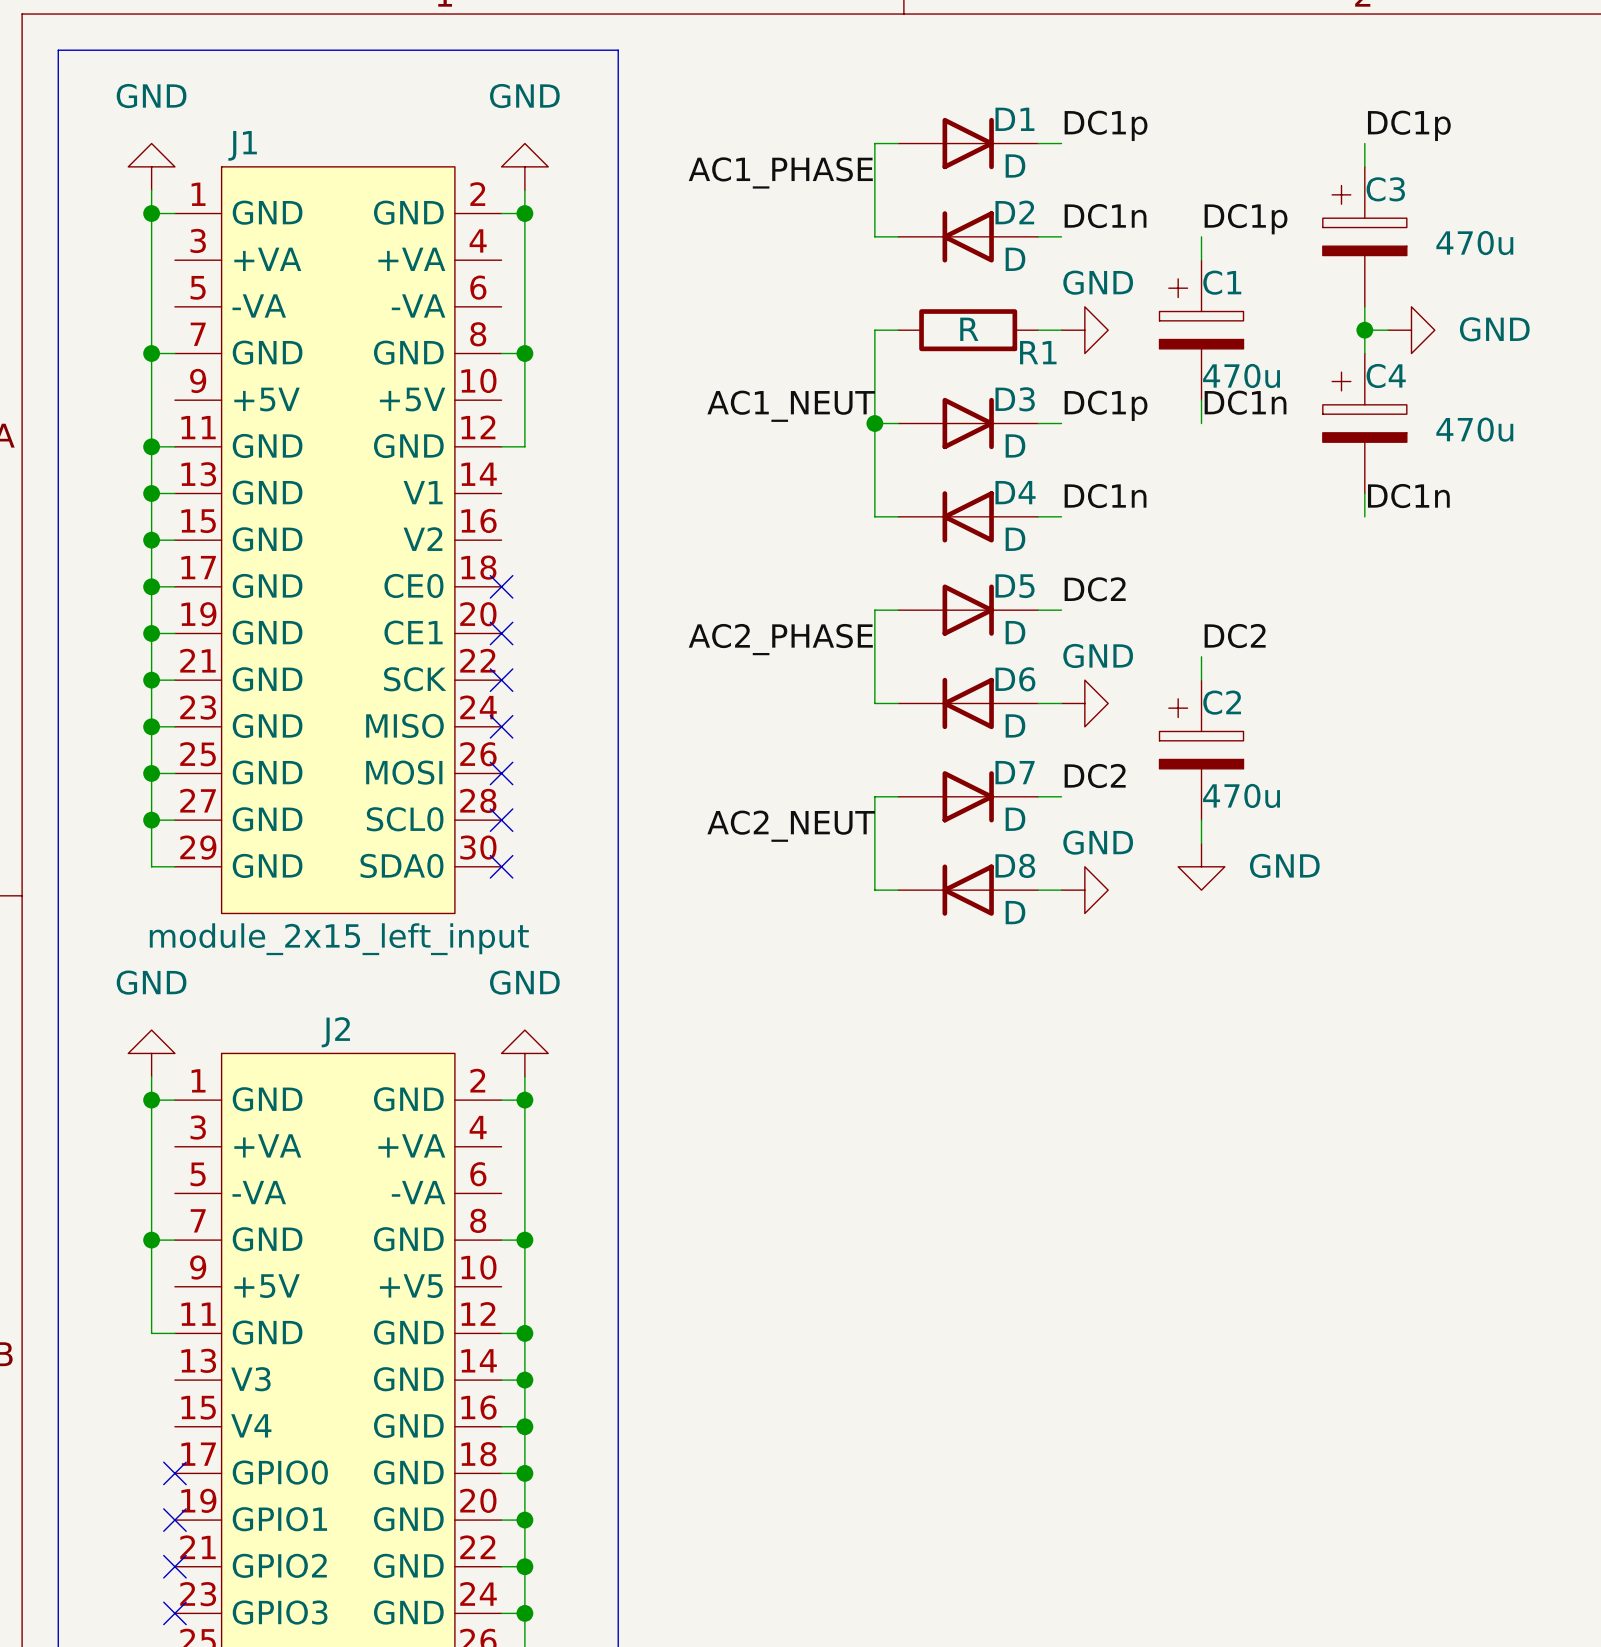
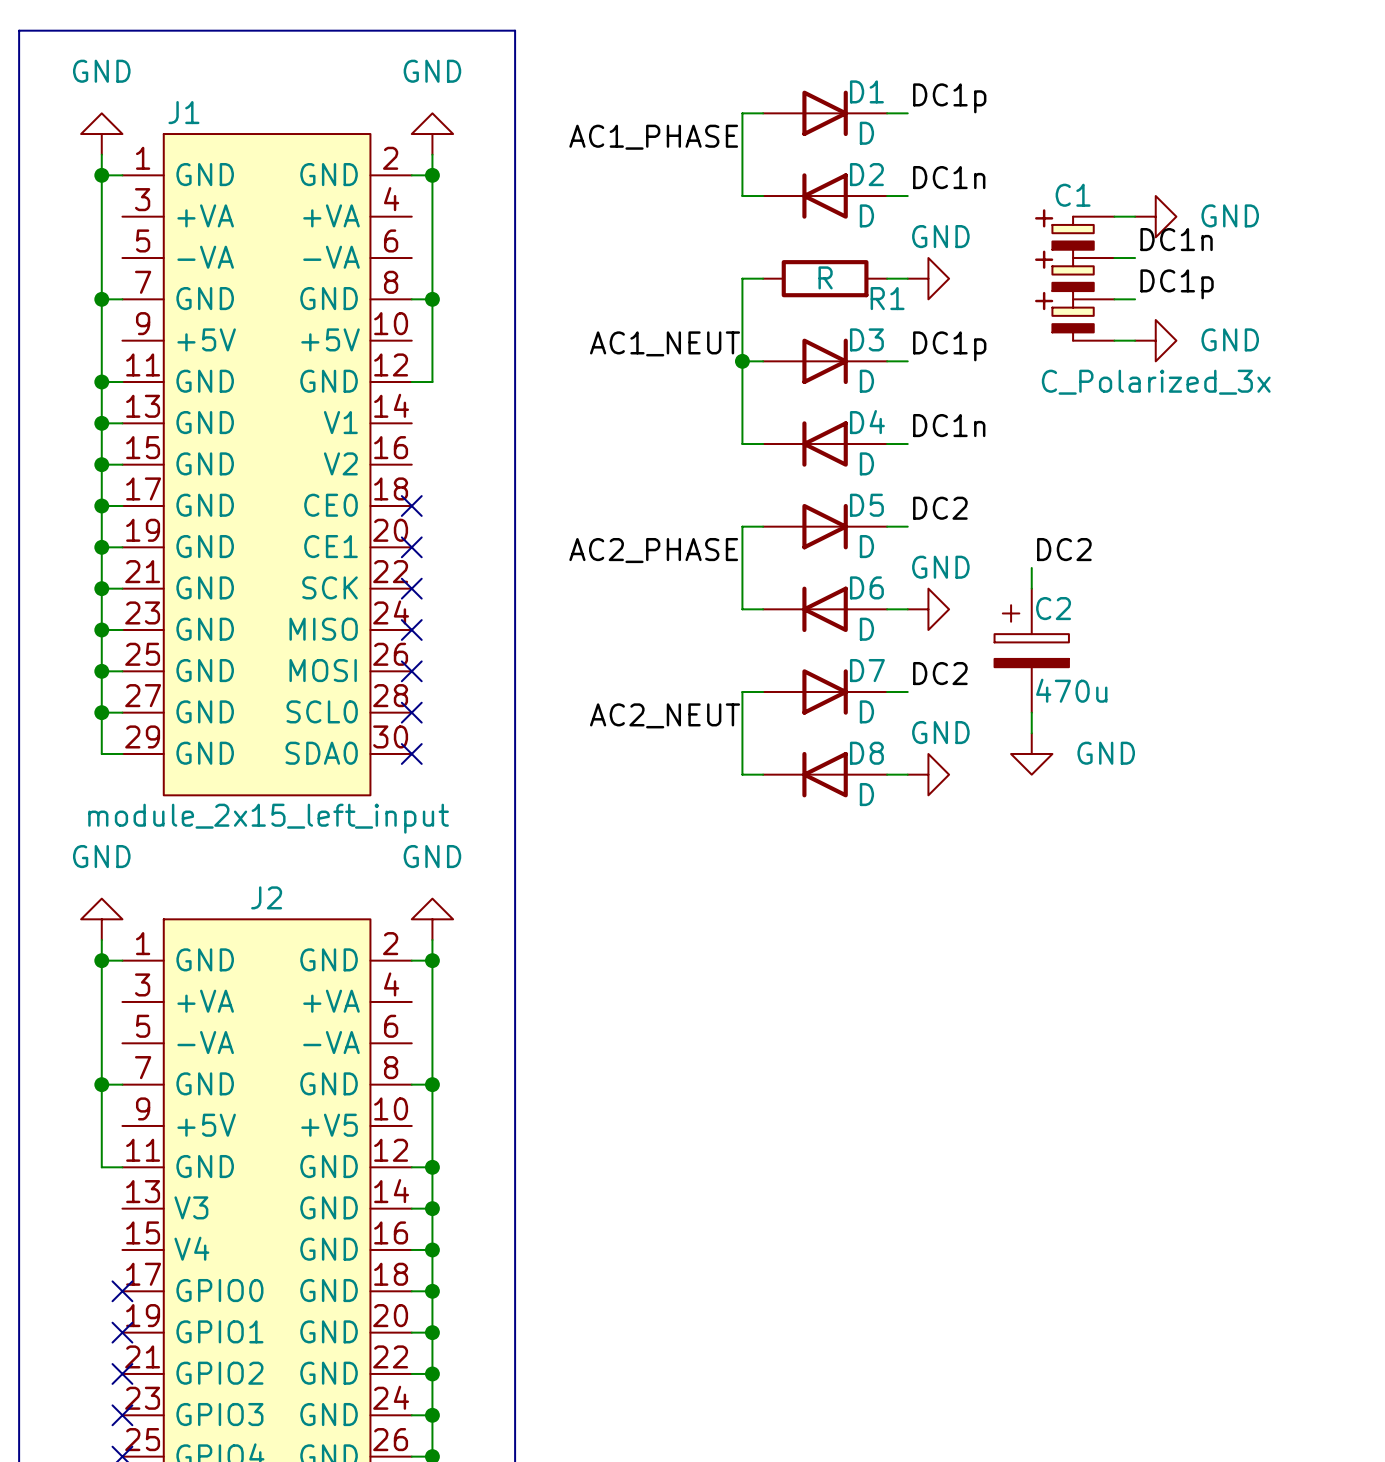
label: DC1p (1409, 125) -> none
wire: (1364, 143) (1364, 166) -> none
label: DC1p (1246, 219) -> none
wire: (1201, 236) (1201, 260) -> none
C3: 470u (1364, 236) -> none
C1 symbol: [1159, 260, 1244, 401] -> [1052, 216, 1115, 341]
wire: none -> (1114, 216) (1135, 216)
power symbol: none -> GND (1155, 216)
C1 name position: C1 (1222, 282) -> C1 (1073, 195)
label: none -> DC1n (1176, 239)
wire: (1364, 306) (1364, 353) -> none
wire: (1364, 330) (1388, 330) -> (1114, 258) (1135, 258)
junction: (1364, 330) -> none
power symbol: GND (1411, 330) -> none
label: none -> DC1p (1177, 284)
wire: none -> (1114, 299) (1135, 299)
C1 value: 470u (1241, 375) -> C_Polarized_3x (1156, 382)
wire: (1201, 400) (1201, 423) -> none
wire: none -> (1114, 340) (1135, 340)
power symbol: none -> GND (1155, 340)
label: DC1n (1245, 402) -> none
C4: 470u (1364, 423) -> none
wire: (1364, 493) (1364, 516) -> none
label: DC1n (1408, 496) -> none

